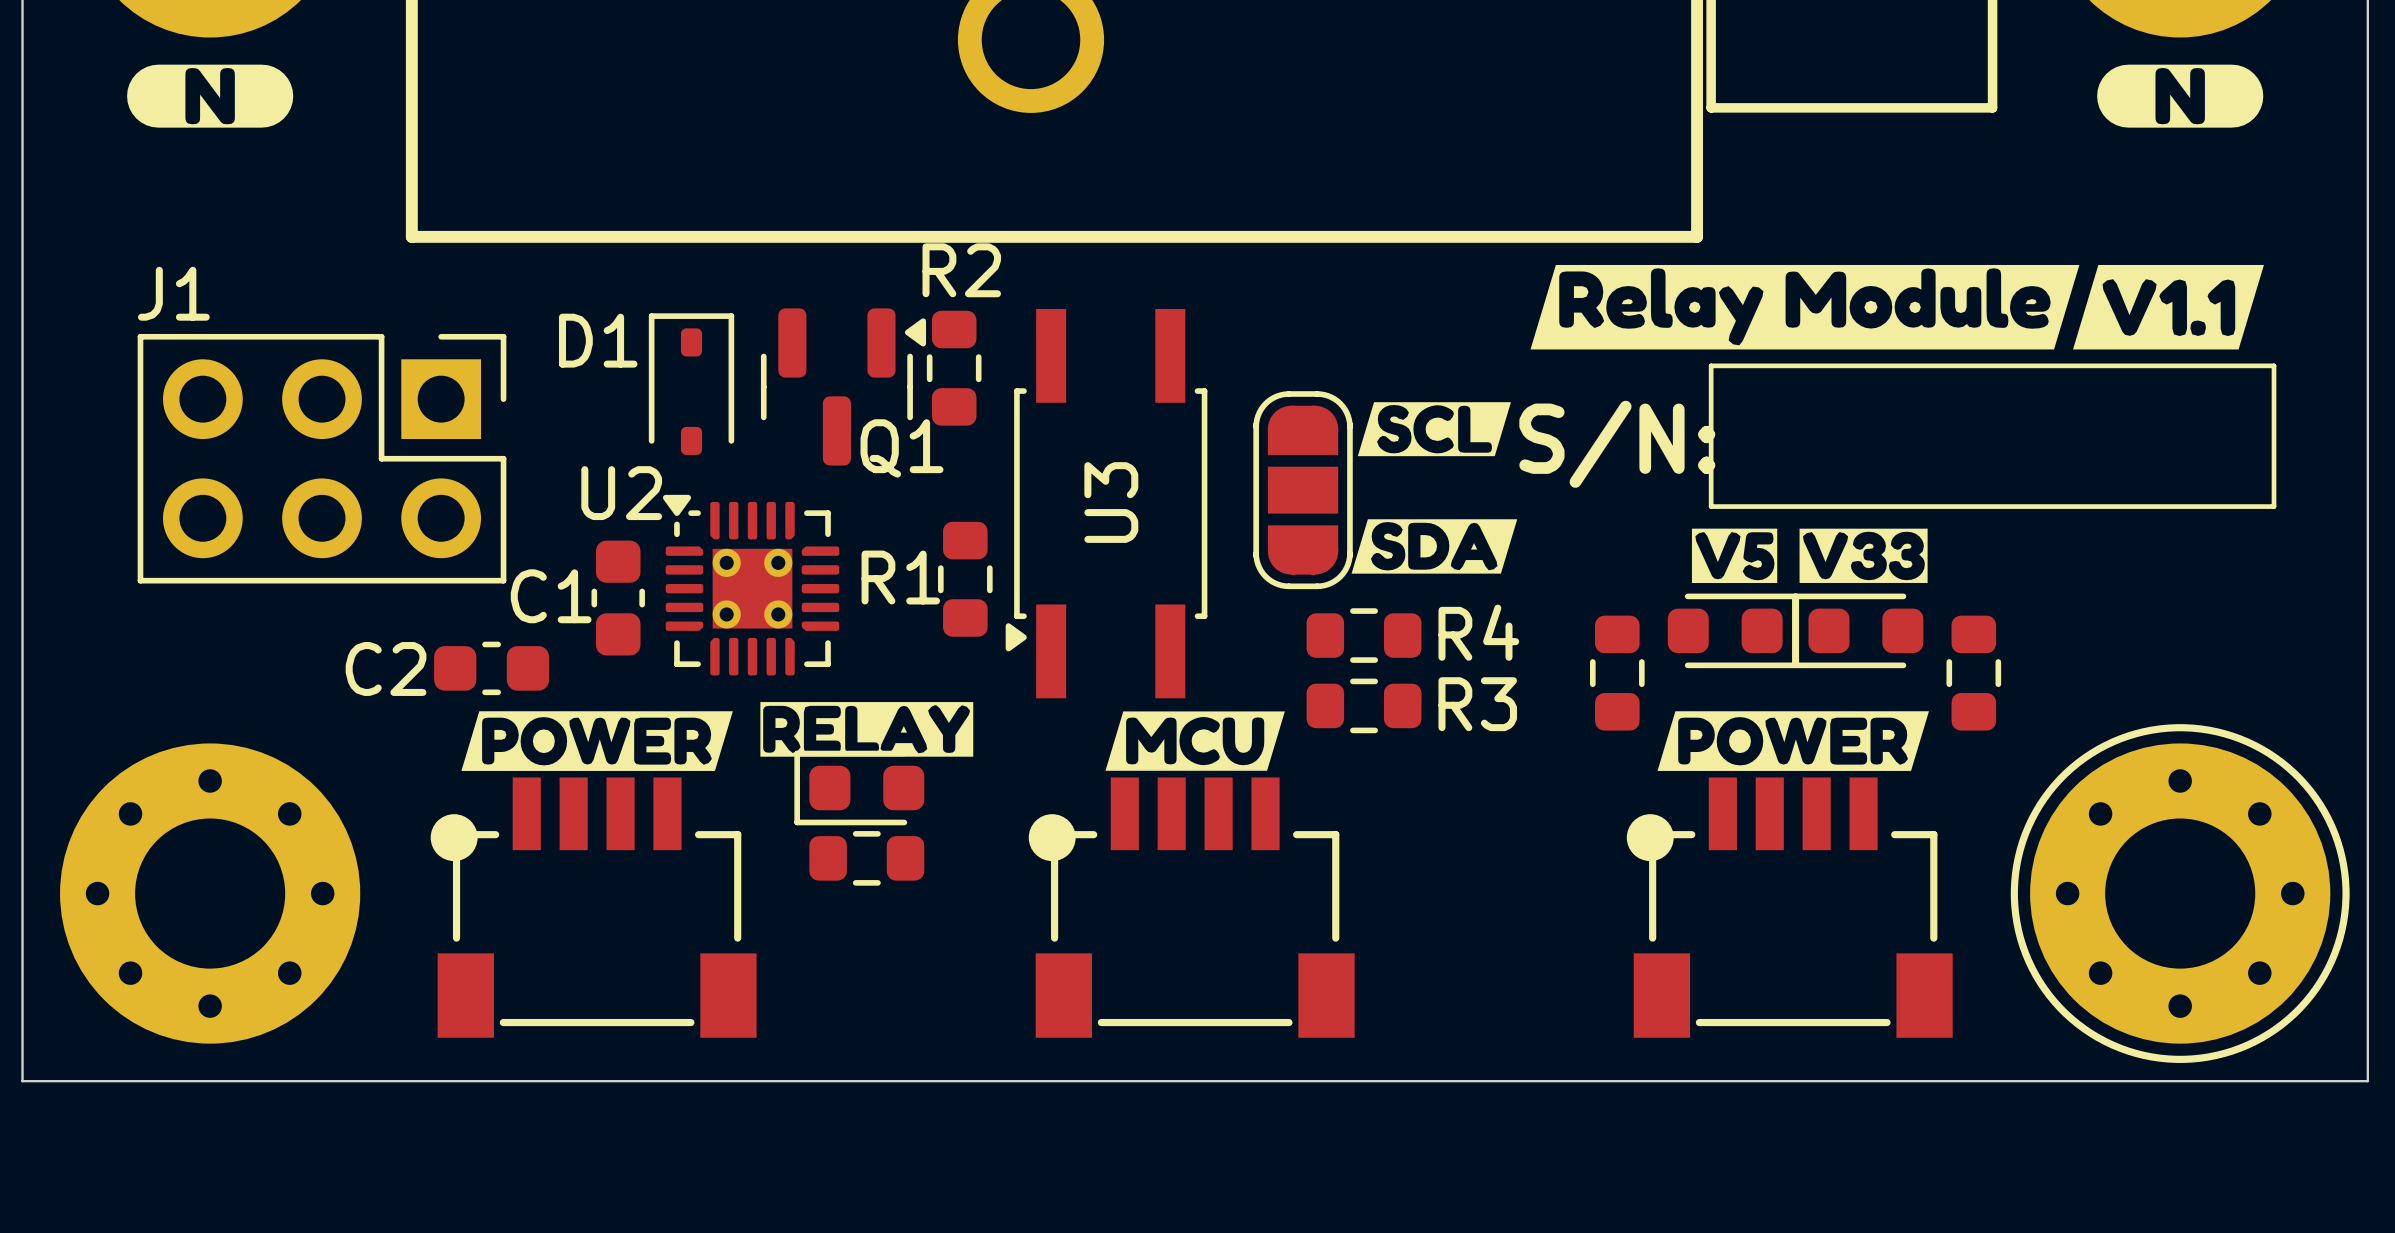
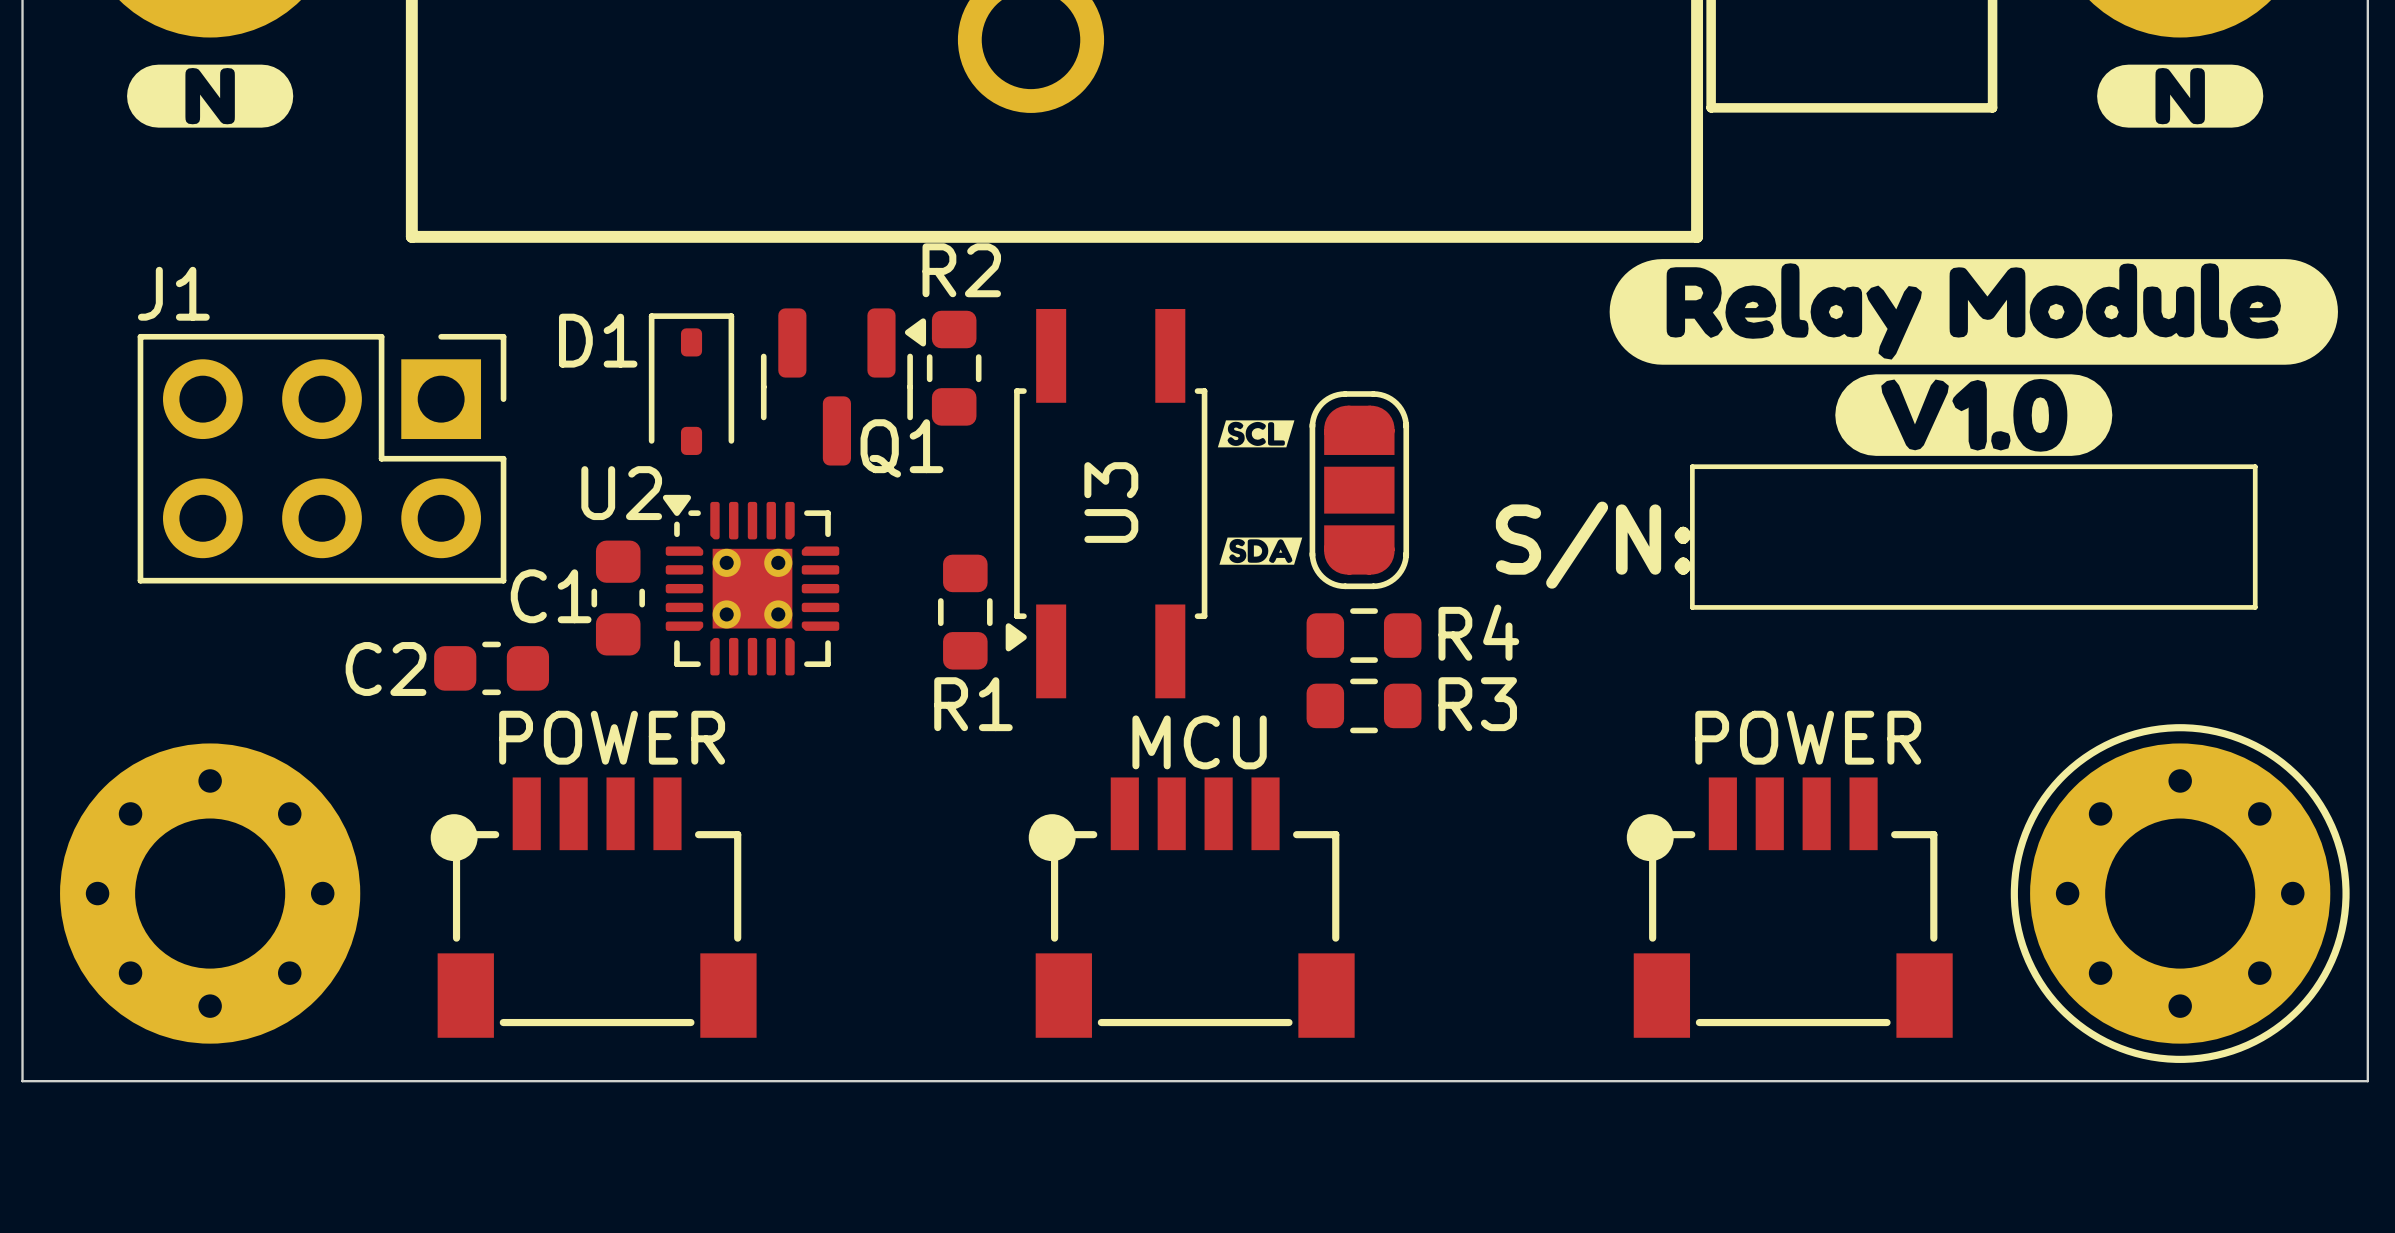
drawing: none -> [1609, 259, 2338, 456]
drawing: [1530, 264, 2264, 350] -> none
line: (1711, 365) (2274, 365) (2274, 506) (1711, 506) (1711, 365) -> (1692, 466) (2255, 466) (2255, 607) (1692, 607) (1692, 466)
drawing: [1357, 402, 1511, 457] -> none
drawing: none -> [1217, 420, 1295, 448]
text position: S/N: (1617, 444) -> S/N: (1593, 545)
part position: (1303, 490) -> (1359, 490)
drawing: [1351, 519, 1518, 574] -> none
drawing: [1691, 528, 1928, 584] -> none
drawing: none -> [1219, 537, 1303, 565]
R1 name position: R1 (900, 577) -> R1 (973, 704)
R1 position: (965, 579) -> (965, 612)
part: (1732, 630) -> none
part: (1858, 630) -> none
part: (1617, 673) -> none
part: (1973, 673) -> none
drawing: [461, 702, 974, 771] -> none
drawing: [1105, 711, 1285, 771] -> none
drawing: [1657, 711, 1929, 771] -> none
text: none -> POWER (612, 737)
text: none -> POWER (1808, 737)
text: none -> MCU (1199, 742)
part: (859, 788) -> none
part: (866, 858) -> none

